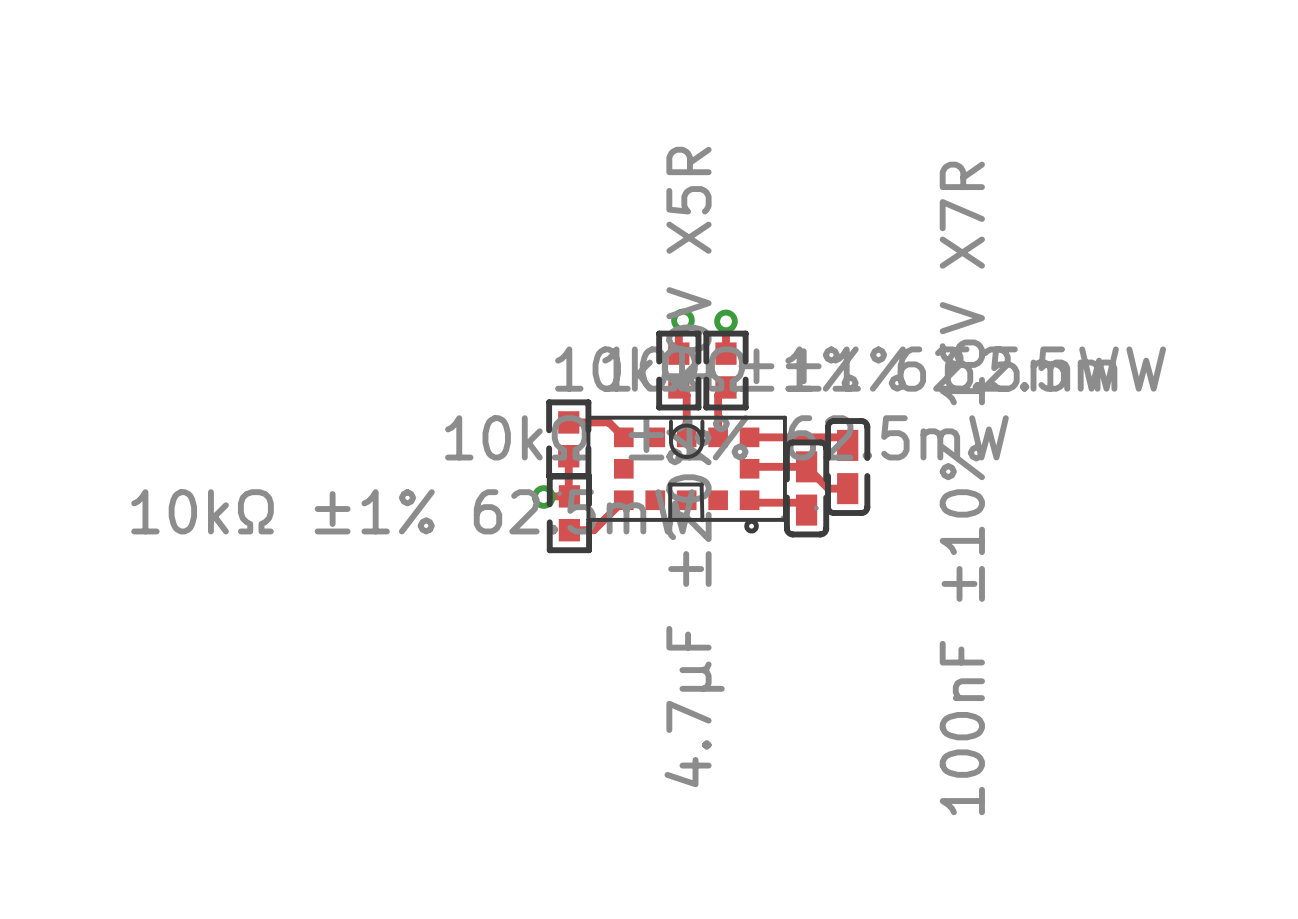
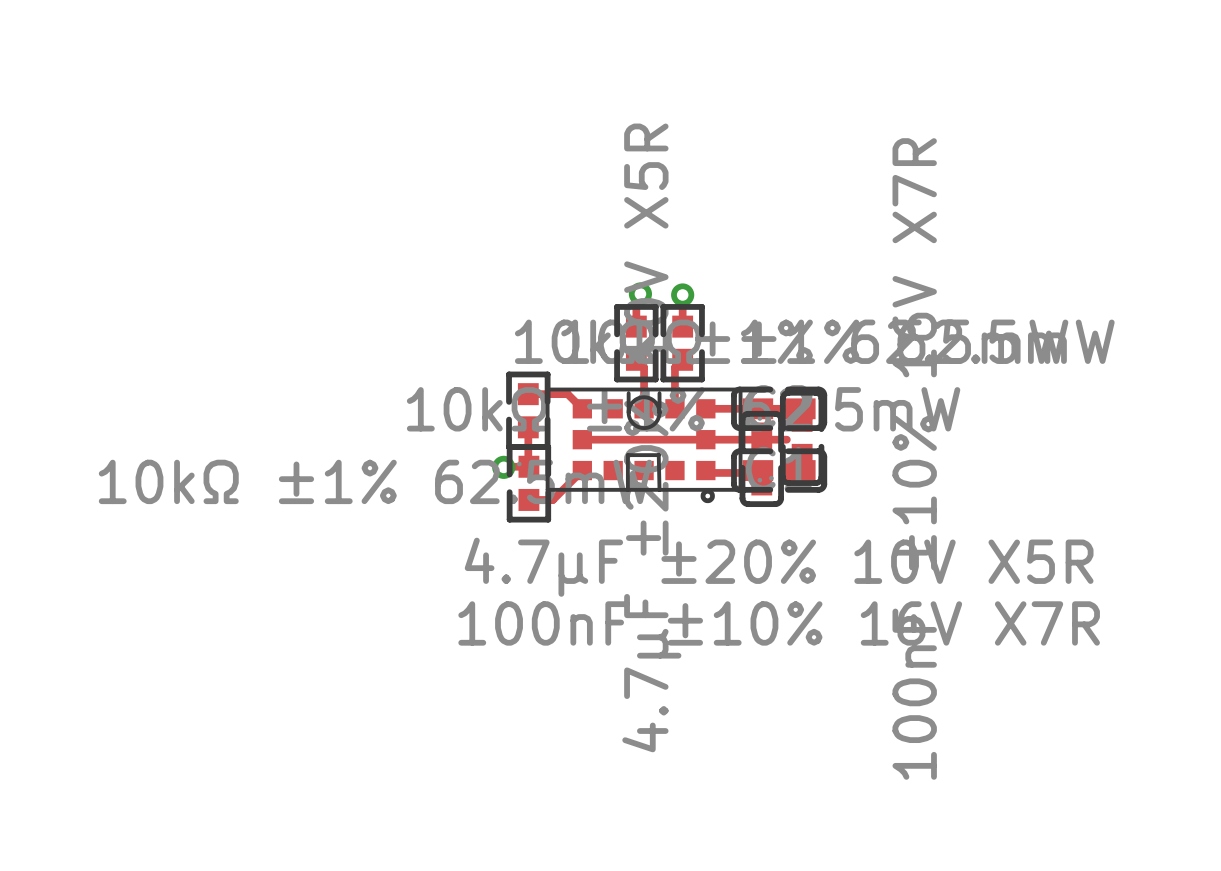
part: none -> 4.7µF ±20% 10V X5R (779, 408)
top track: none -> (582, 439) (786, 439)
top track: (749, 468) (751, 466) (806, 466) (828, 488) (847, 488) -> none
part: none -> 100nF ±10% 16V X7R (779, 470)

